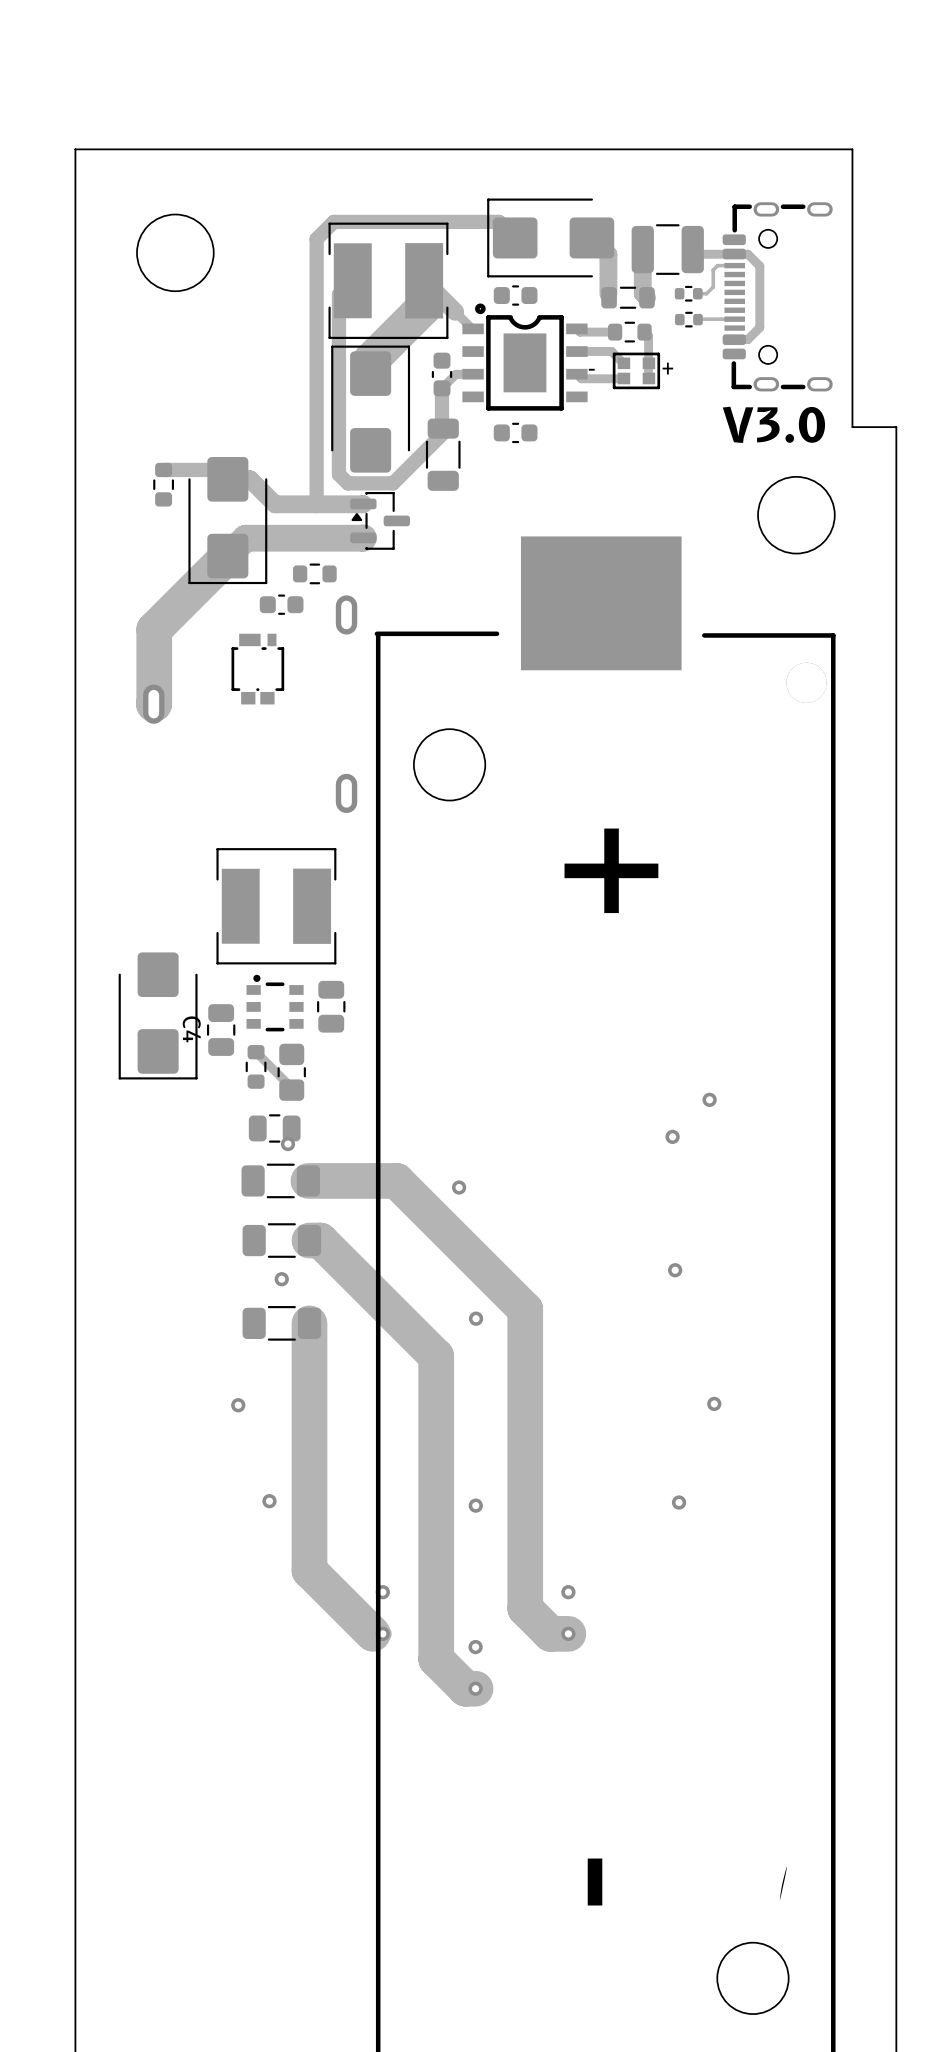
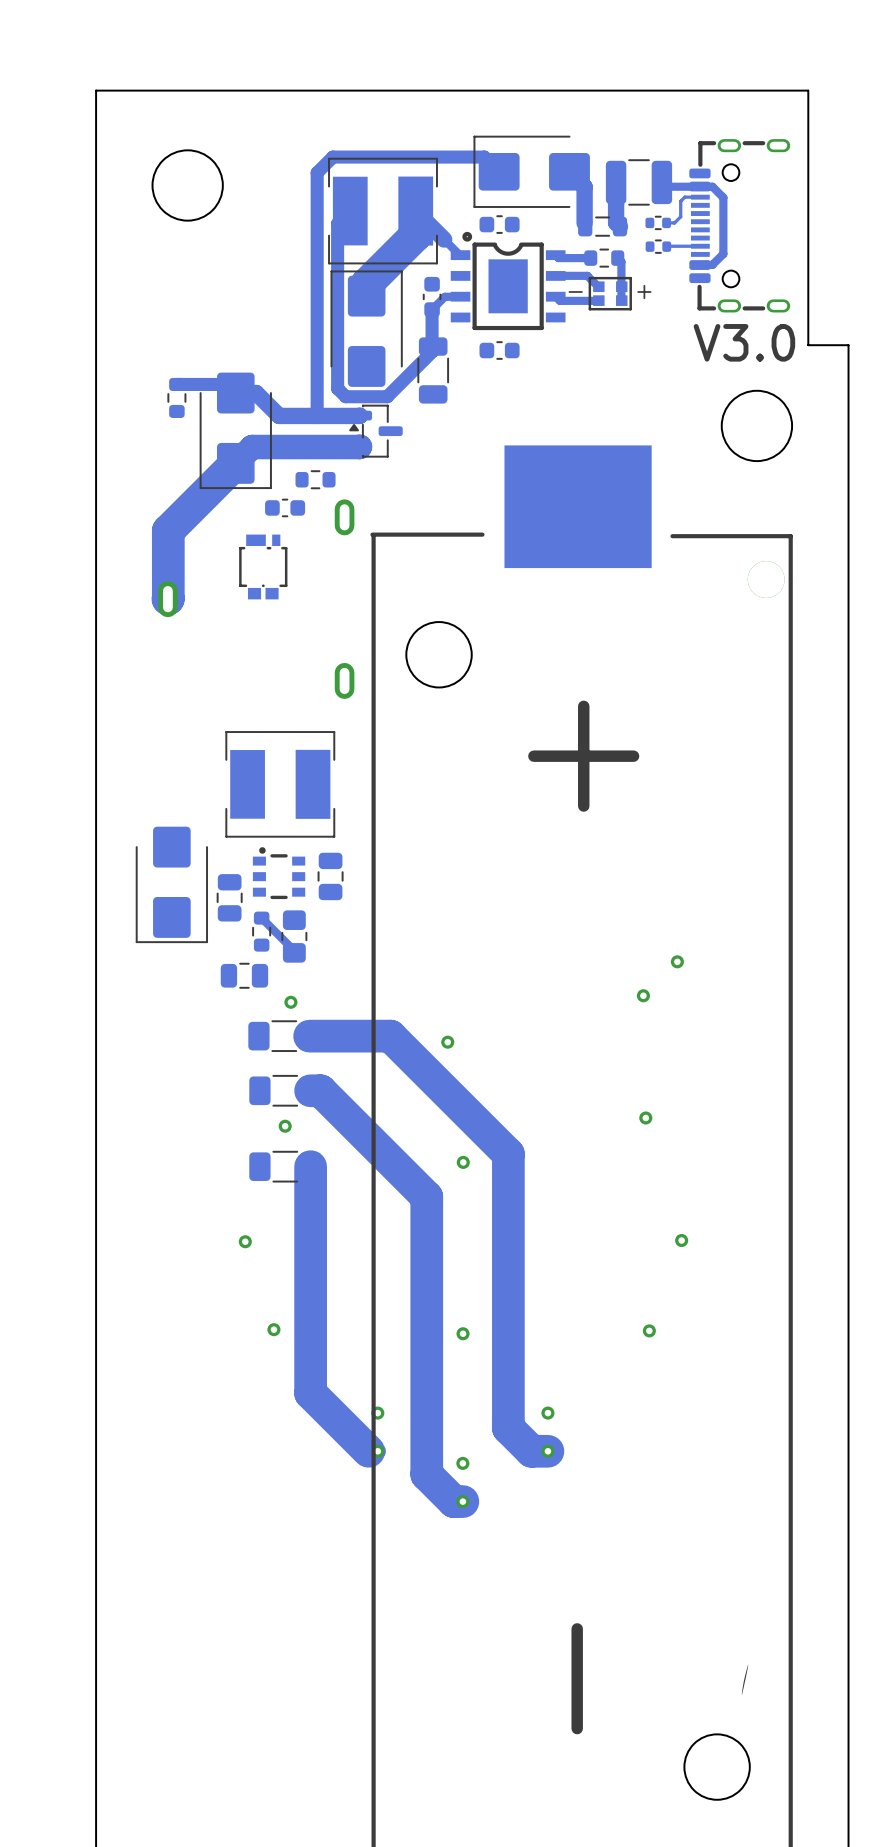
C4 name: C4 (191, 1029) -> none
part position: (274, 1128) -> (244, 975)

